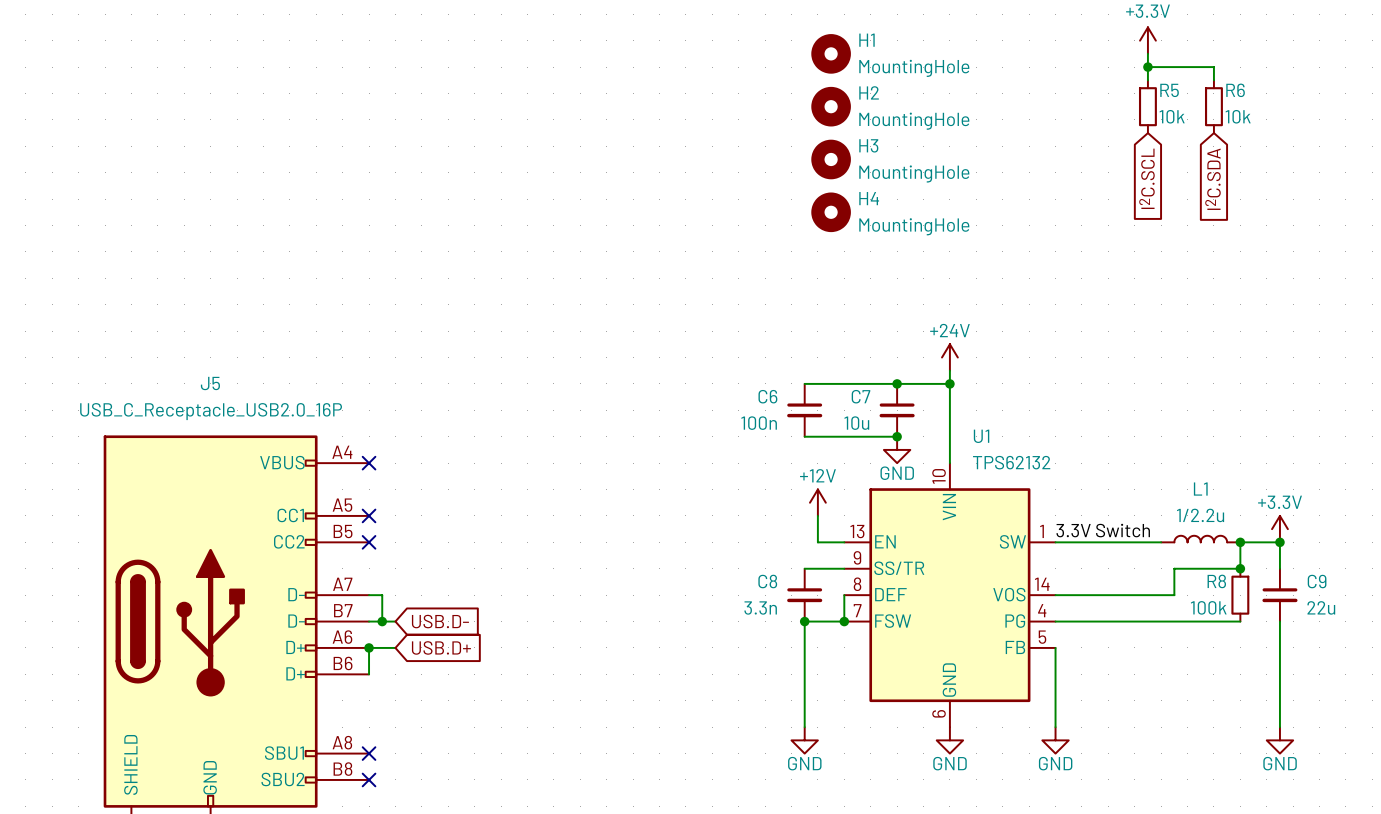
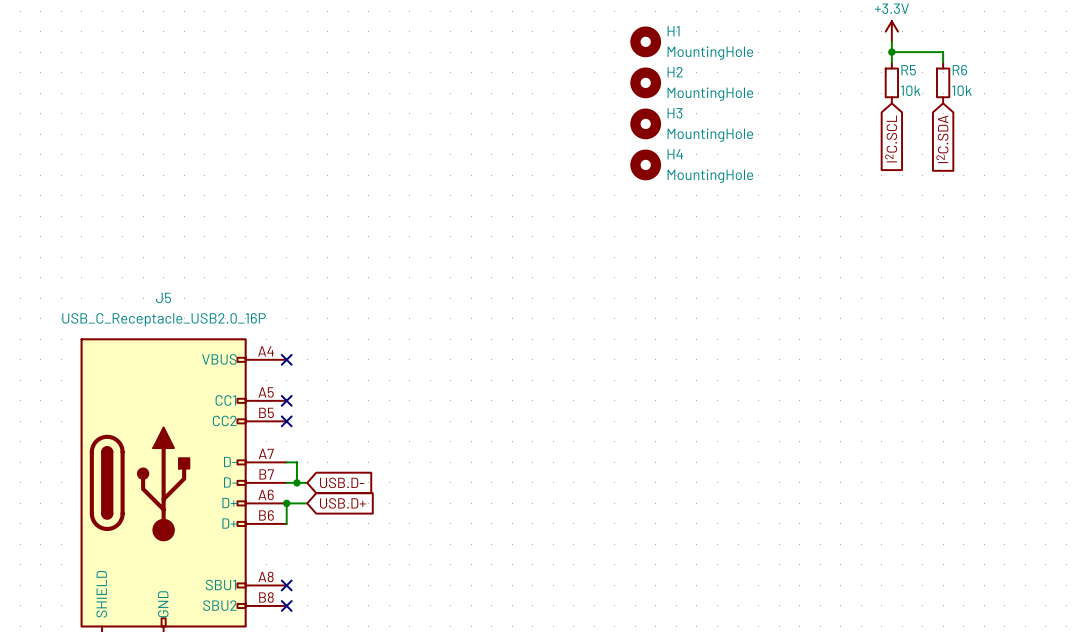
power symbol: +24V (949, 357) -> none
wire: (949, 370) (949, 463) -> none
wire: (804, 383) (949, 383) -> none
junction: (897, 383) -> none
junction: (949, 383) -> none
C6: 100n (804, 410) -> none
C7: 10u (897, 410) -> none
wire: (804, 436) (897, 436) -> none
junction: (897, 436) -> none
power symbol: GND (897, 449) -> none
power symbol: +12V (817, 502) -> none
wire: (817, 515) (817, 542) (844, 542) -> none
power symbol: +3.3V (1279, 529) -> none
label: 3.3V Switch (1103, 530) -> none
L1: 1/2.2u (1200, 539) -> none
wire: (1055, 542) (1161, 542) -> none
junction: (1240, 542) -> none
junction: (1279, 542) -> none
wire: (804, 568) (844, 568) -> none
junction: (1240, 568) -> none
wire: (1279, 568) (1279, 542) (1240, 542) (1240, 568) (1174, 568) (1174, 595) (1055, 595) -> none
C8: 3.3n (804, 595) -> none
wire: (844, 595) (844, 621) (804, 621) (804, 727) -> none
U1: TPS62132 (949, 595) -> none
R8: 100k (1240, 595) -> none
C9: 22u (1279, 595) -> none
junction: (804, 621) -> none
junction: (844, 621) -> none
wire: (1055, 621) (1240, 621) -> none
wire: (1279, 621) (1279, 727) -> none
wire: (1055, 647) (1055, 727) -> none
power symbol: GND (804, 740) -> none
power symbol: GND (949, 740) -> none
power symbol: GND (1055, 740) -> none
power symbol: GND (1279, 740) -> none

